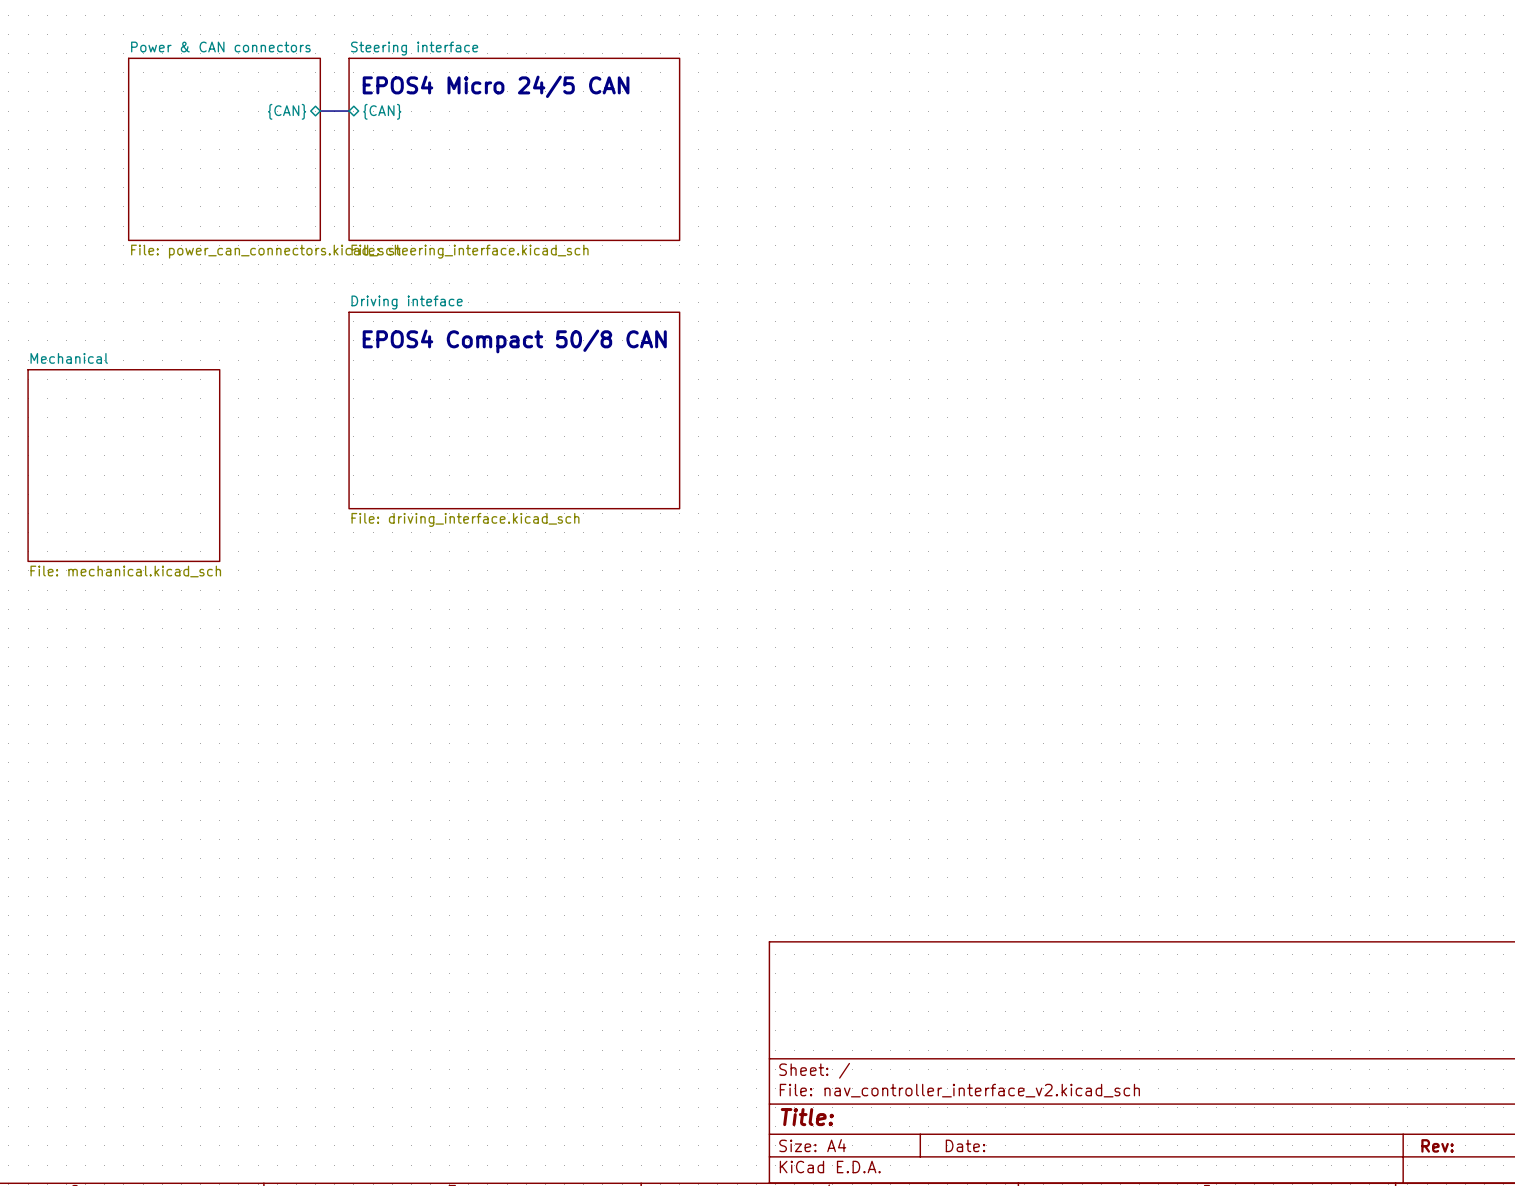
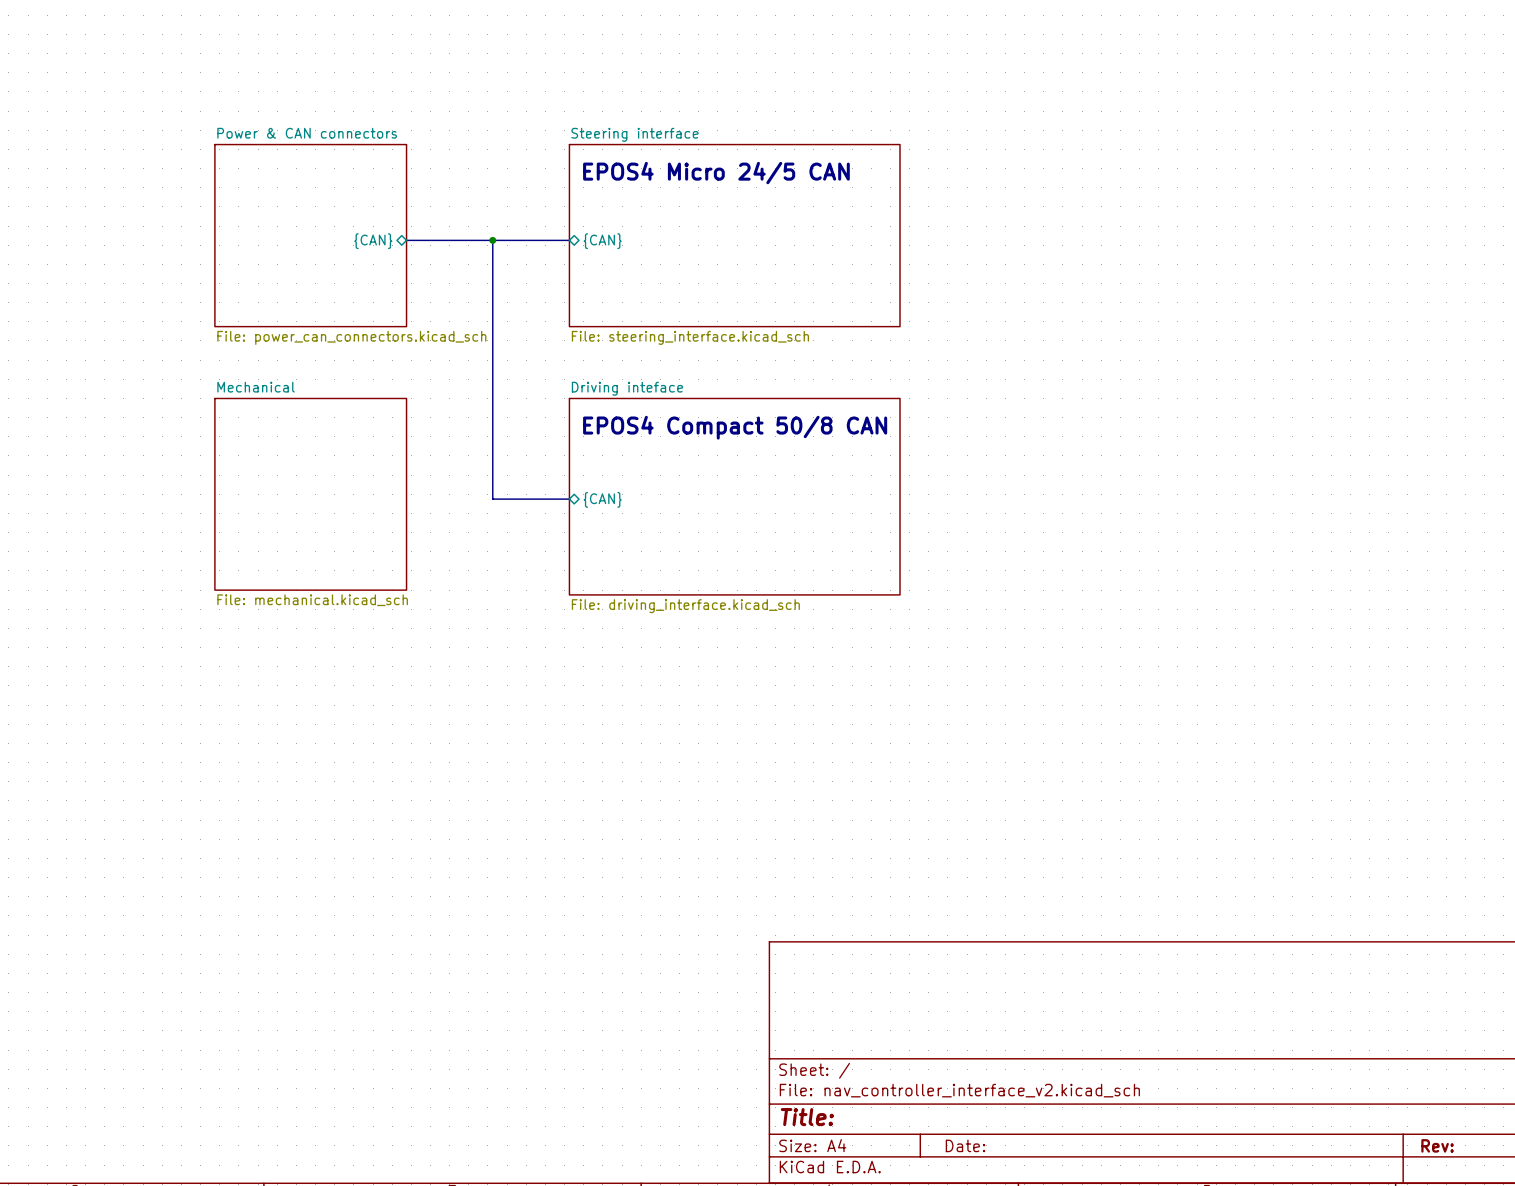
text: EPOS4 Micro 24/5 CAN (496, 86) -> none
sheet pin: {CAN} (287, 111) -> none
bus: (320, 111) (349, 111) -> none
sheet pin: {CAN} (382, 111) -> none
sheet Power & CAN connectors position: (224, 149) -> (310, 235)
sheet Steering interface: File: steering_interface.kicad_sch (514, 149) -> none
text: none -> EPOS4 Micro 24/5 CAN (716, 173)
sheet Steering interface: none -> File: steering_interface.kicad_sch (734, 235)
bus: none -> (406, 240) (569, 240)
bus: none -> (492, 240) (492, 499) (569, 499)
junction: none -> (492, 240)
sheet pin: none -> {CAN} (373, 241)
sheet pin: none -> {CAN} (602, 241)
text: EPOS4 Compact 50/8 CAN (514, 341) -> none
sheet Driving inteface: File: driving_interface.kicad_sch (514, 410) -> none
text: none -> EPOS4 Compact 50/8 CAN (735, 427)
sheet Mechanical: File: mechanical.kicad_sch (123, 465) -> none
sheet Mechanical: none -> File: mechanical.kicad_sch (310, 494)
sheet Driving inteface: none -> File: driving_interface.kicad_sch (734, 496)
sheet pin: none -> {CAN} (602, 499)

